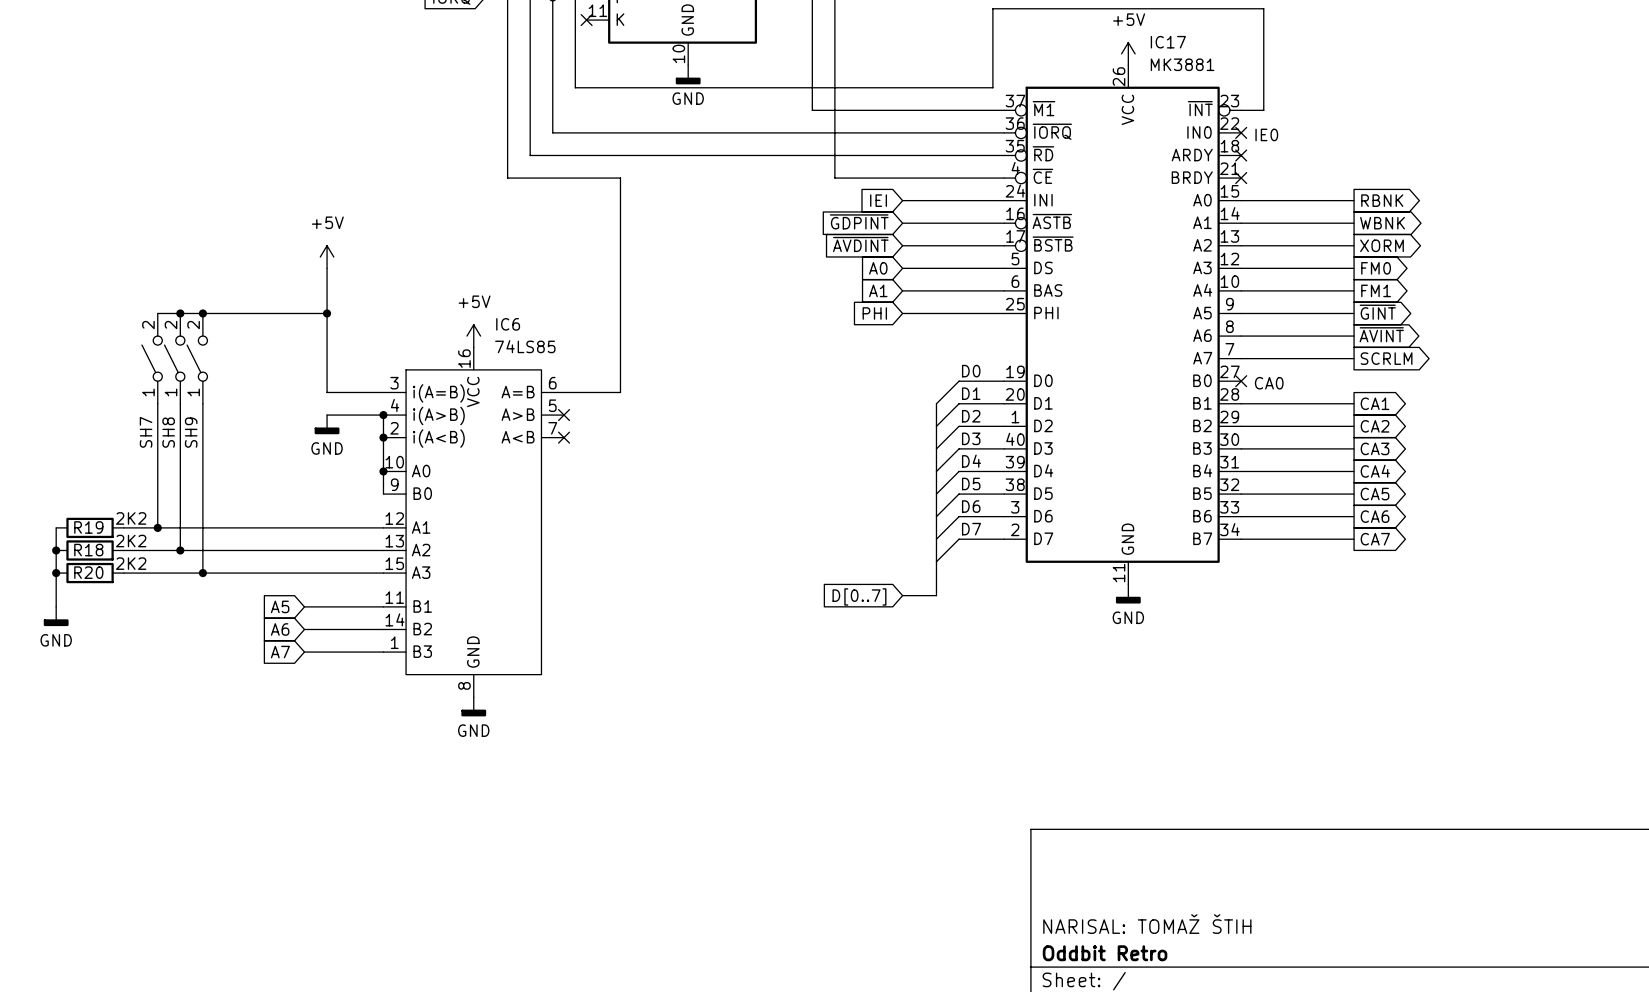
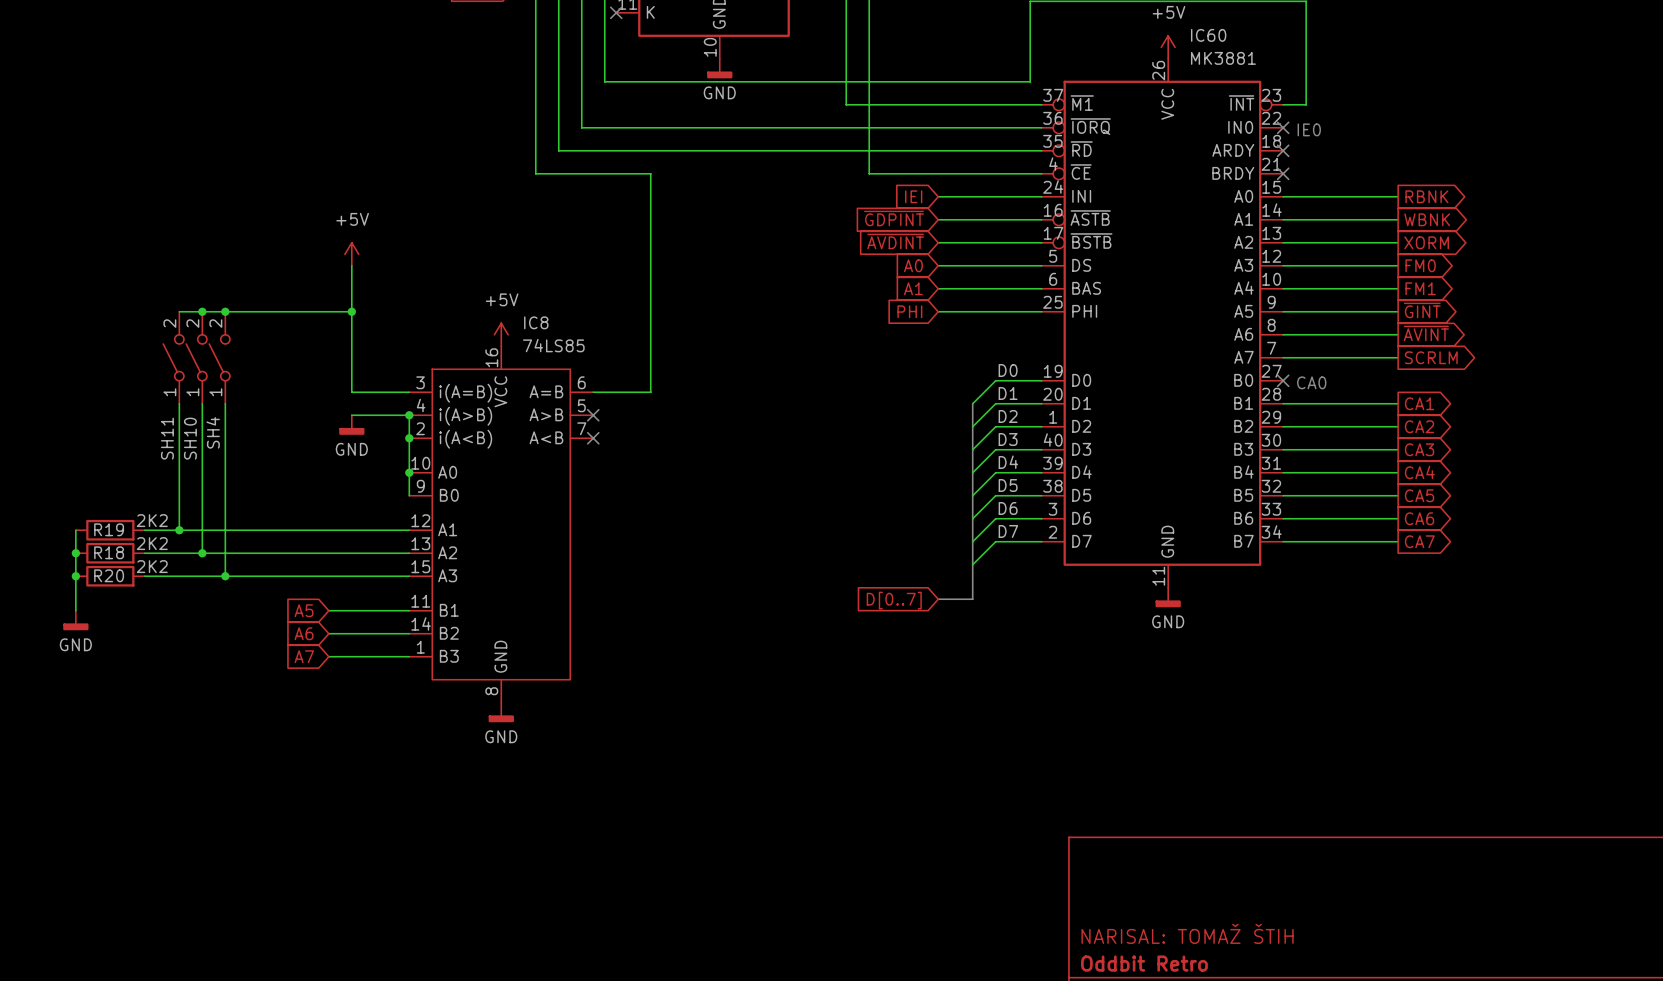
IC17 name: IC17 (1168, 42) -> IC60 (1208, 35)
IC6 name: IC6 (508, 324) -> IC8 (536, 322)
SH7 name: SH7 (146, 432) -> SH11 (167, 438)
SH8 name: SH8 (168, 432) -> SH10 (190, 438)
SH9 name: SH9 (191, 432) -> SH4 (213, 432)

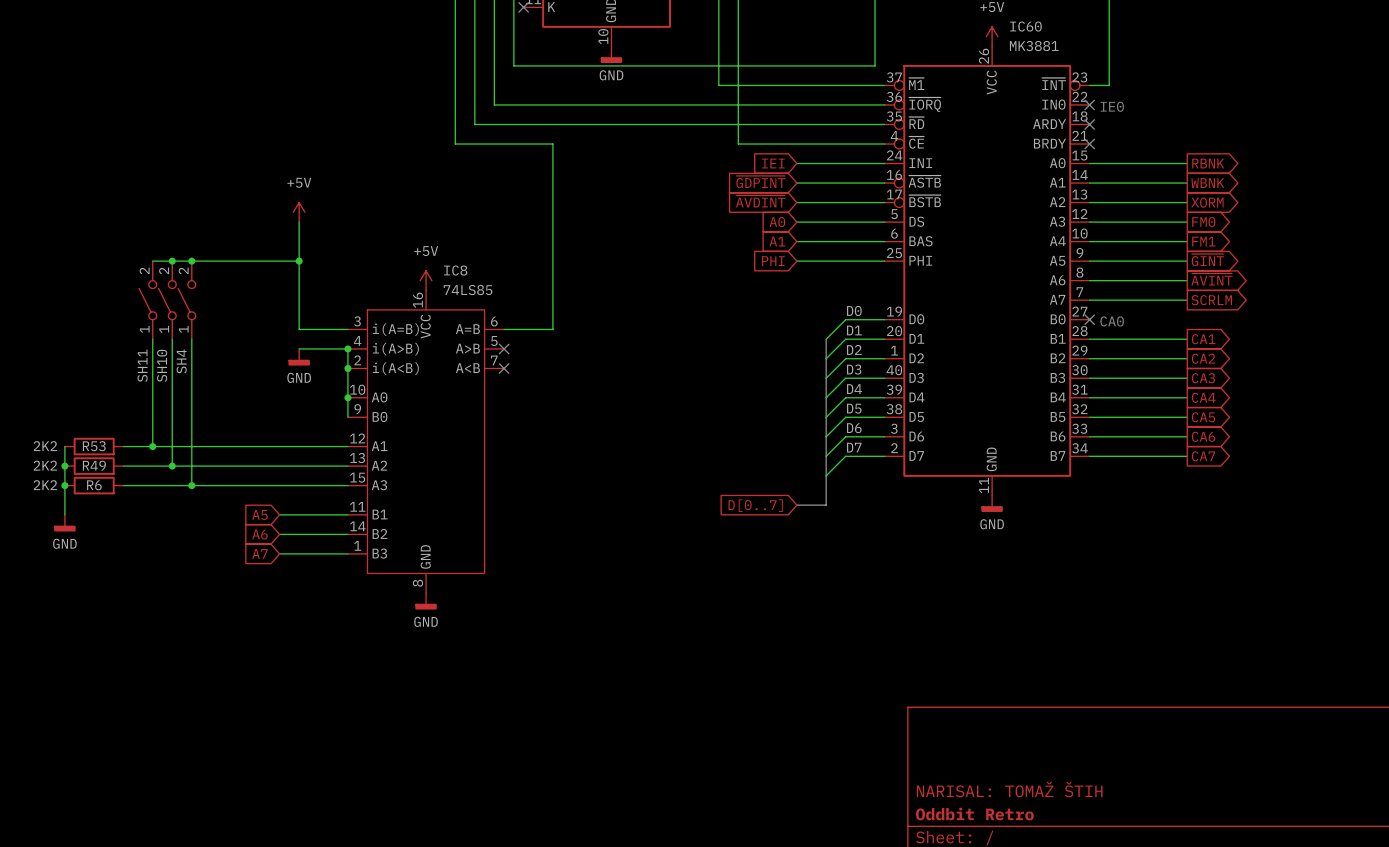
R19 value position: 2K2 (152, 520) -> 2K2 (45, 446)
R19 name: R19 (109, 529) -> R53 (94, 446)
R18 value position: 2K2 (152, 543) -> 2K2 (45, 465)
R18 name: R18 (109, 552) -> R49 (94, 465)
R20 value position: 2K2 (152, 566) -> 2K2 (45, 485)
R20 name: R20 (109, 575) -> R6 (94, 485)

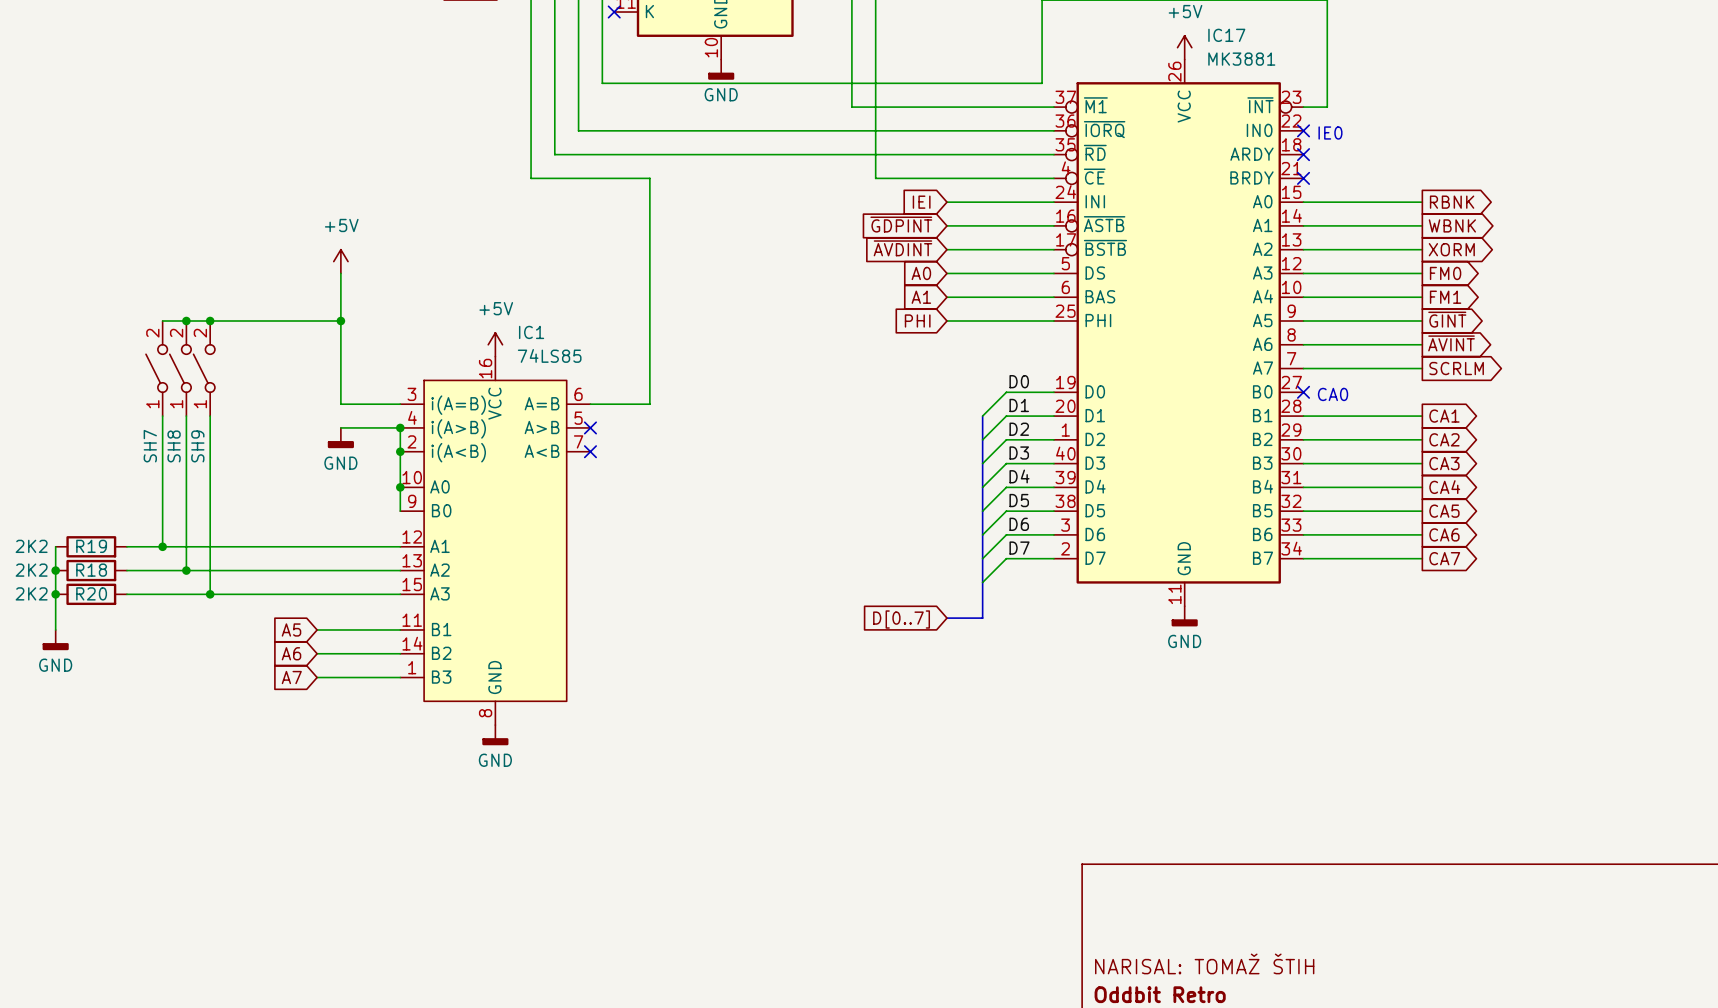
IC60 name: IC60 (1025, 26) -> IC17 (1226, 35)
IC8 name: IC8 (455, 270) -> IC1 (531, 332)
SH4 name: SH4 (181, 361) -> SH9 (197, 446)
SH11 name: SH11 (142, 365) -> SH7 (150, 446)
SH10 name: SH10 (162, 365) -> SH8 (174, 446)
R53 name: R53 (94, 446) -> R19 (91, 546)
R49 name: R49 (94, 465) -> R18 (91, 570)
R6 name: R6 (94, 485) -> R20 (91, 593)

